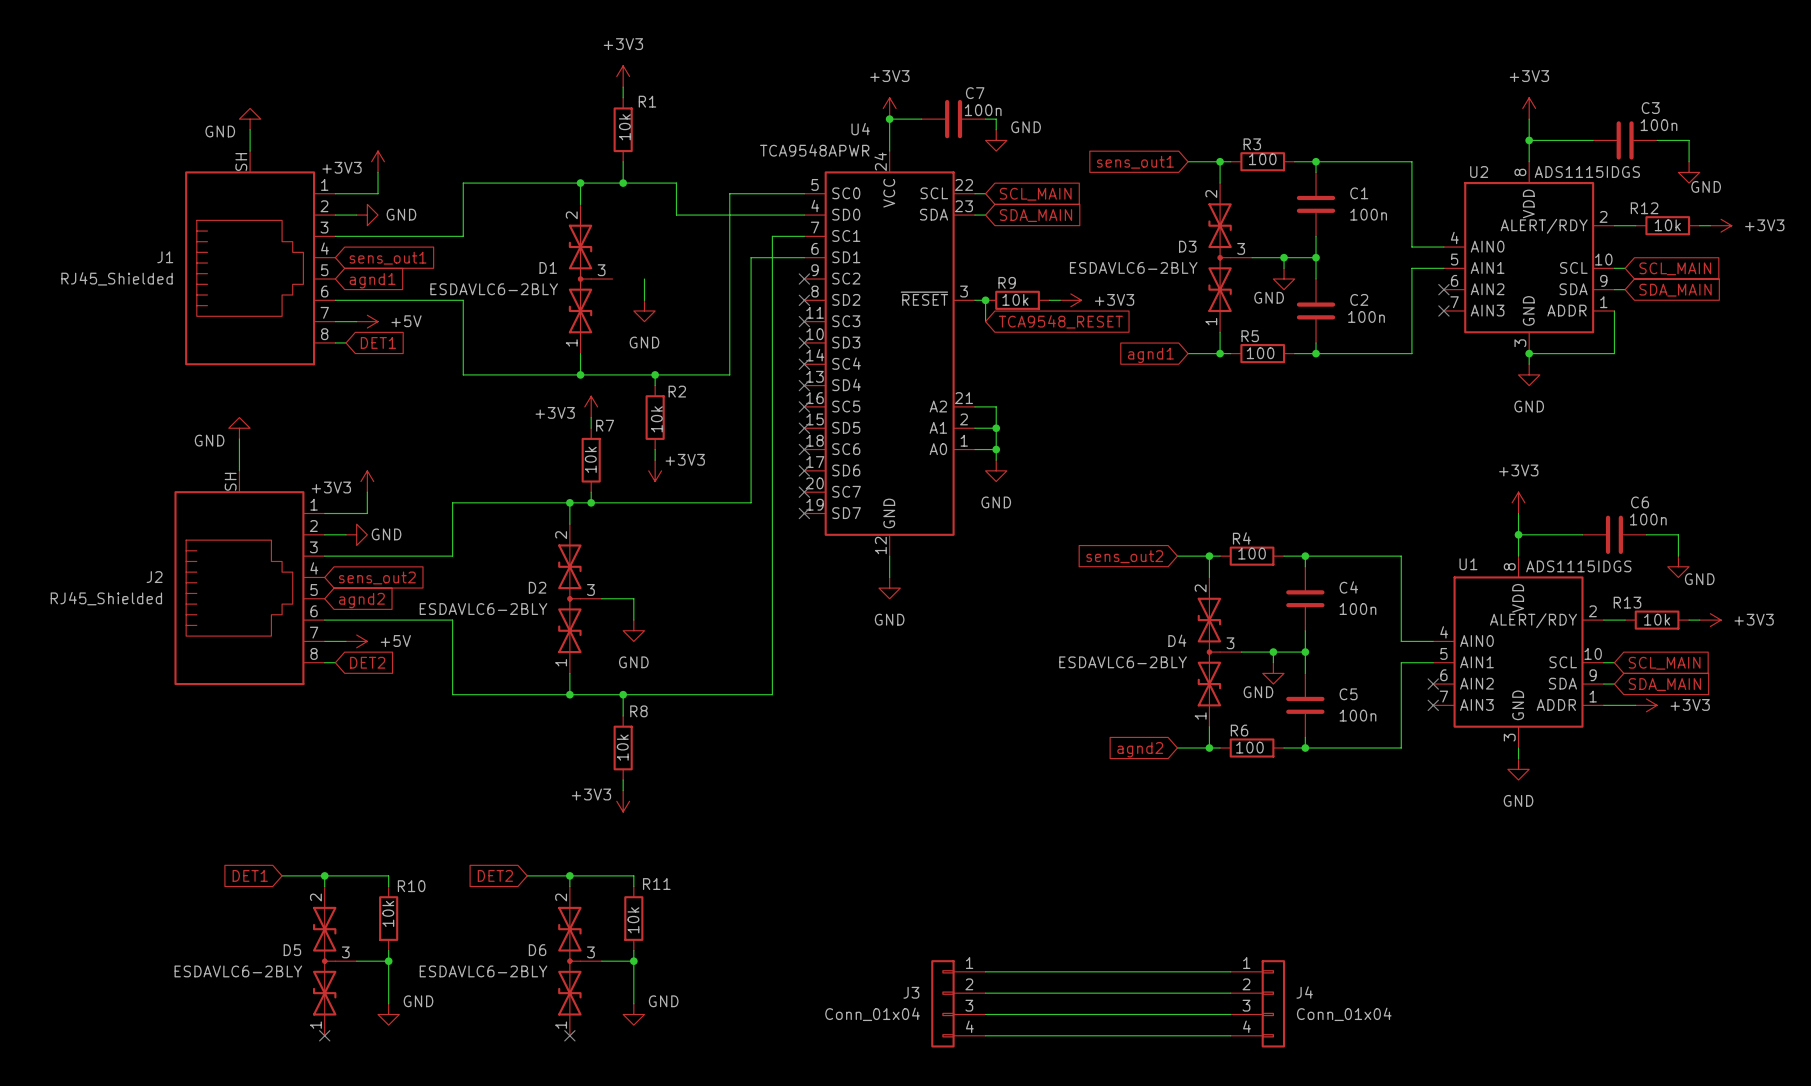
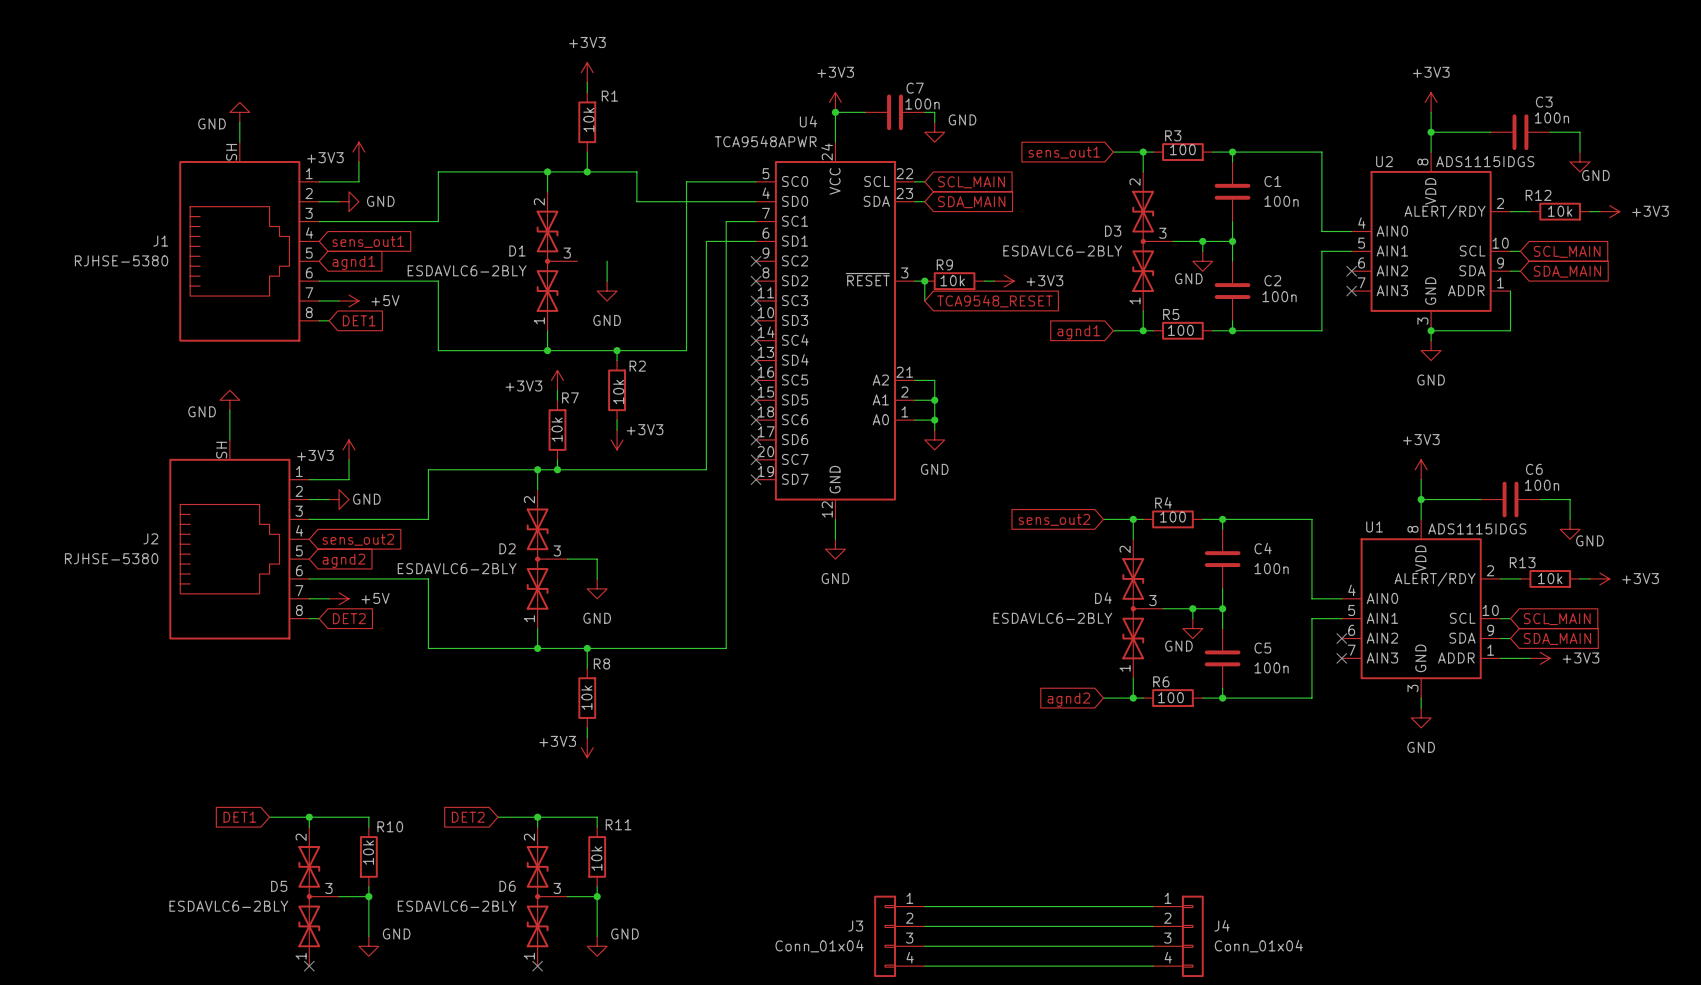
J1 value: RJ45_Shielded (117, 278) -> RJHSE-5380 (121, 260)
J2 value: RJ45_Shielded (106, 598) -> RJHSE-5380 (111, 558)

